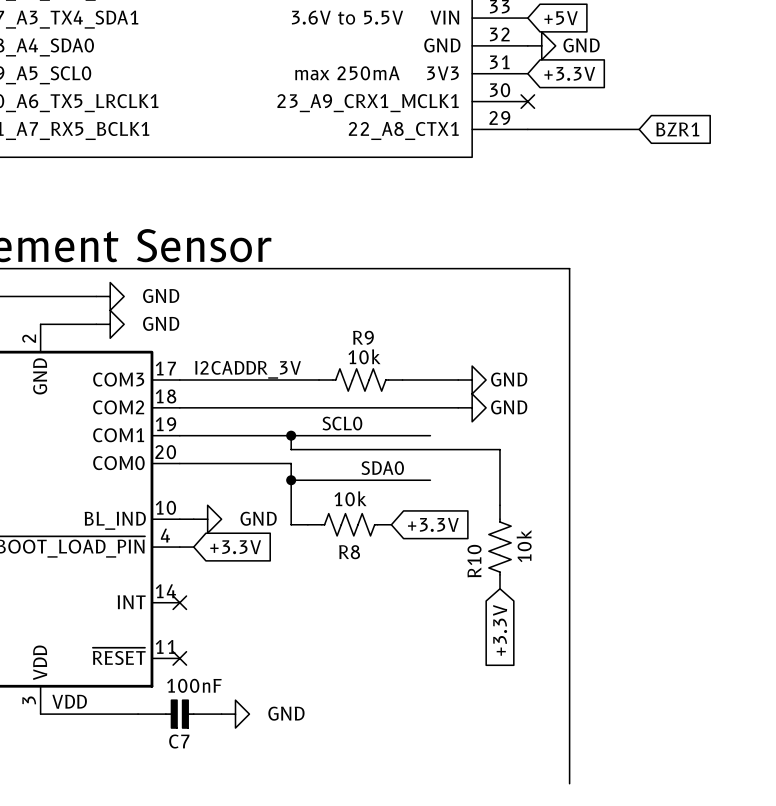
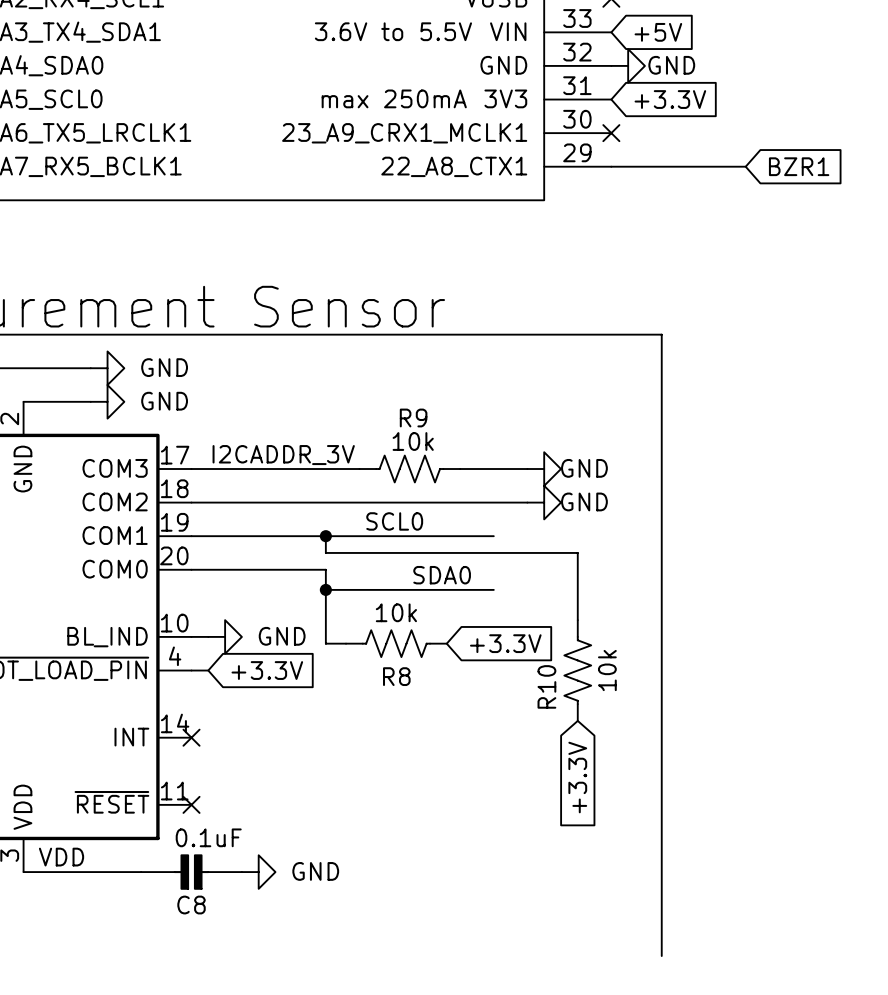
C7 value: 100nF (194, 685) -> 0.1uF (208, 837)
C7 name: C7 (179, 741) -> C8 (191, 905)

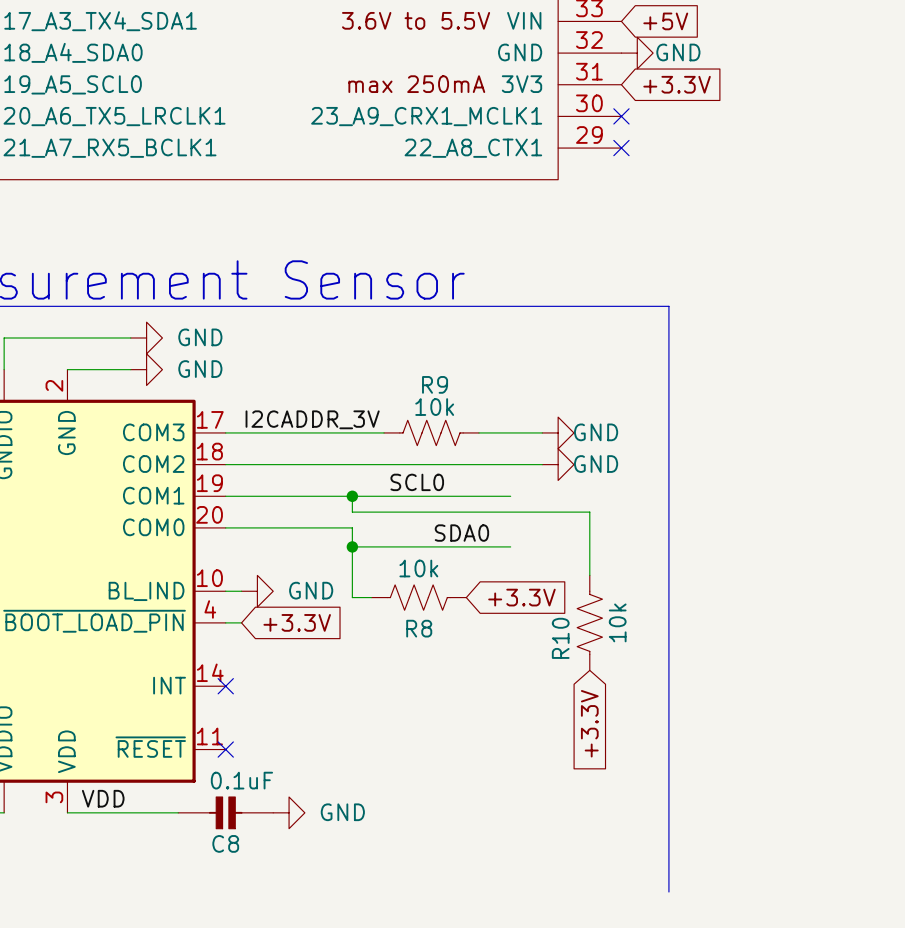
wire: (611, 166) (745, 166) -> none
no-connect mark: none -> (621, 148)
global label: BZR1 (799, 166) -> none

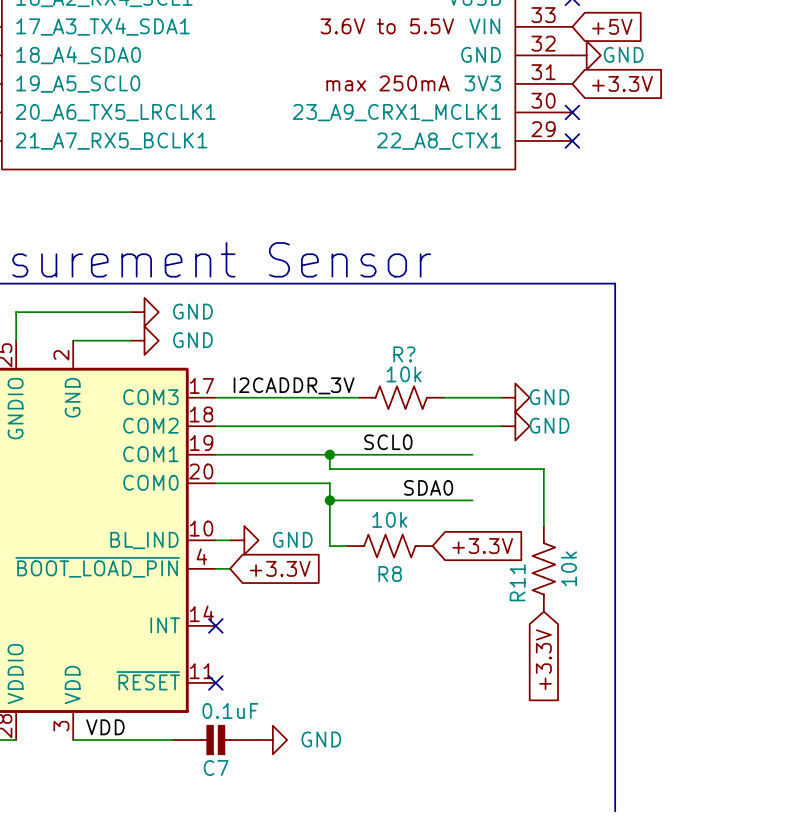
R9 name: R9 (435, 384) -> R? (404, 354)
R10 name: R10 (560, 638) -> R11 (517, 582)
C8 name: C8 (225, 843) -> C7 (216, 768)

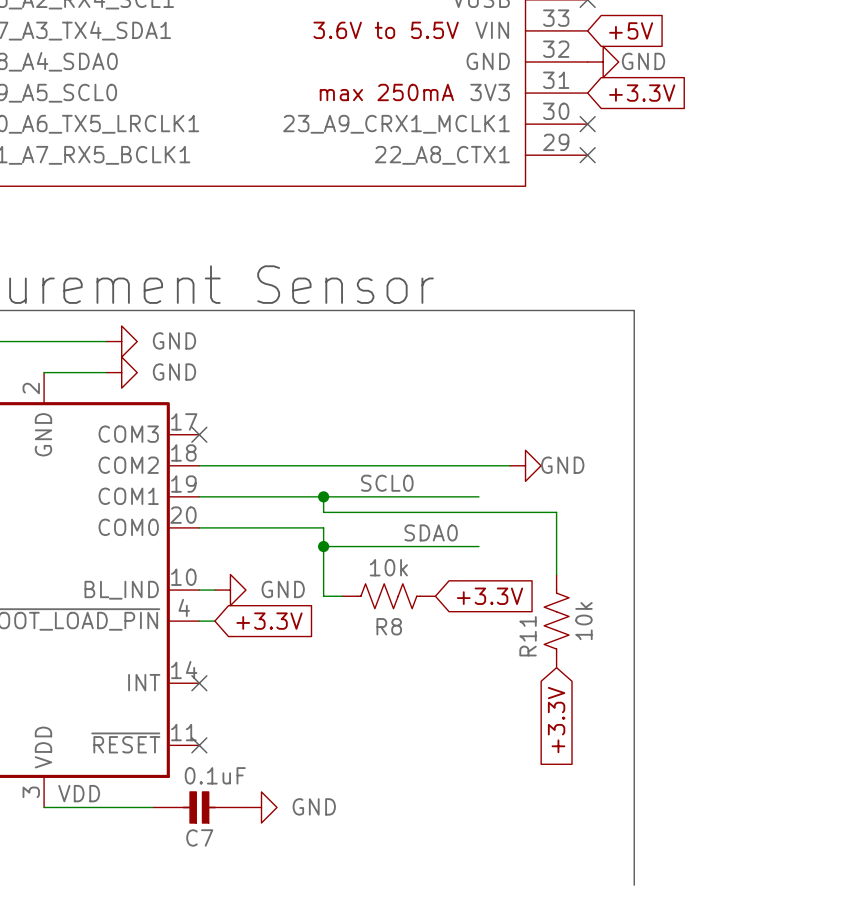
label: I2CADDR_3V (294, 385) -> none
wire: (215, 397) (358, 397) -> none
no-connect mark: none -> (199, 434)
R?: 10k (401, 397) -> none
wire: (444, 397) (501, 397) -> none
power symbol: GND (515, 397) -> none

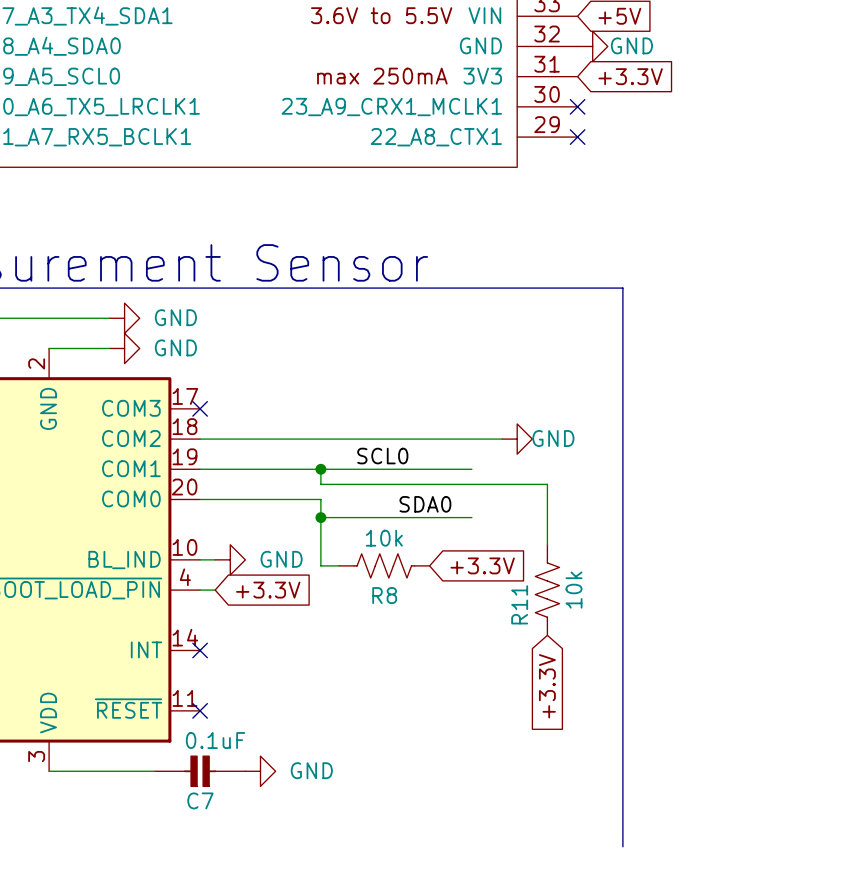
label: VDD (79, 793) -> none

